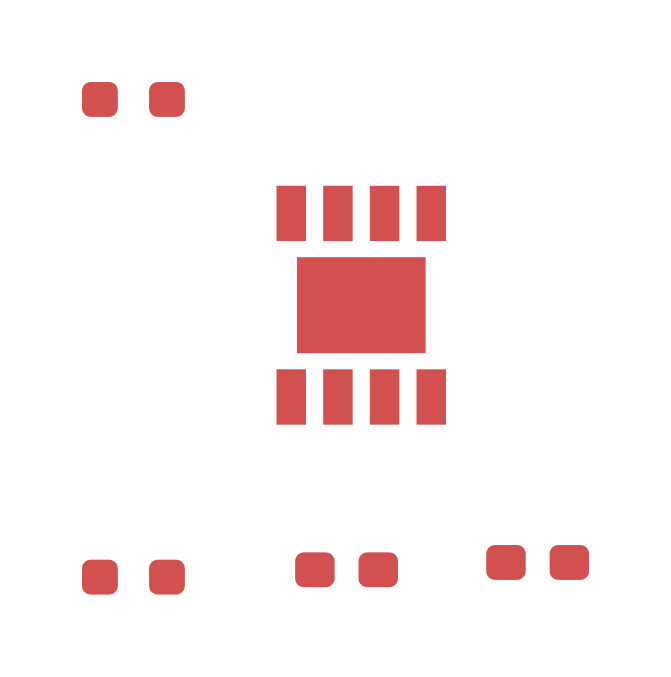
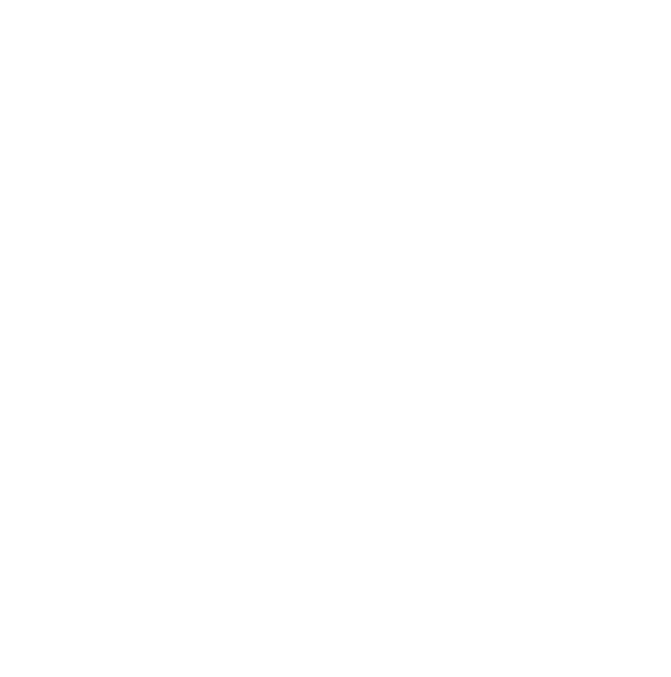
part: (133, 99) -> none
part: (361, 305) -> none
part: (537, 562) -> none
part: (346, 569) -> none
part: (133, 577) -> none

